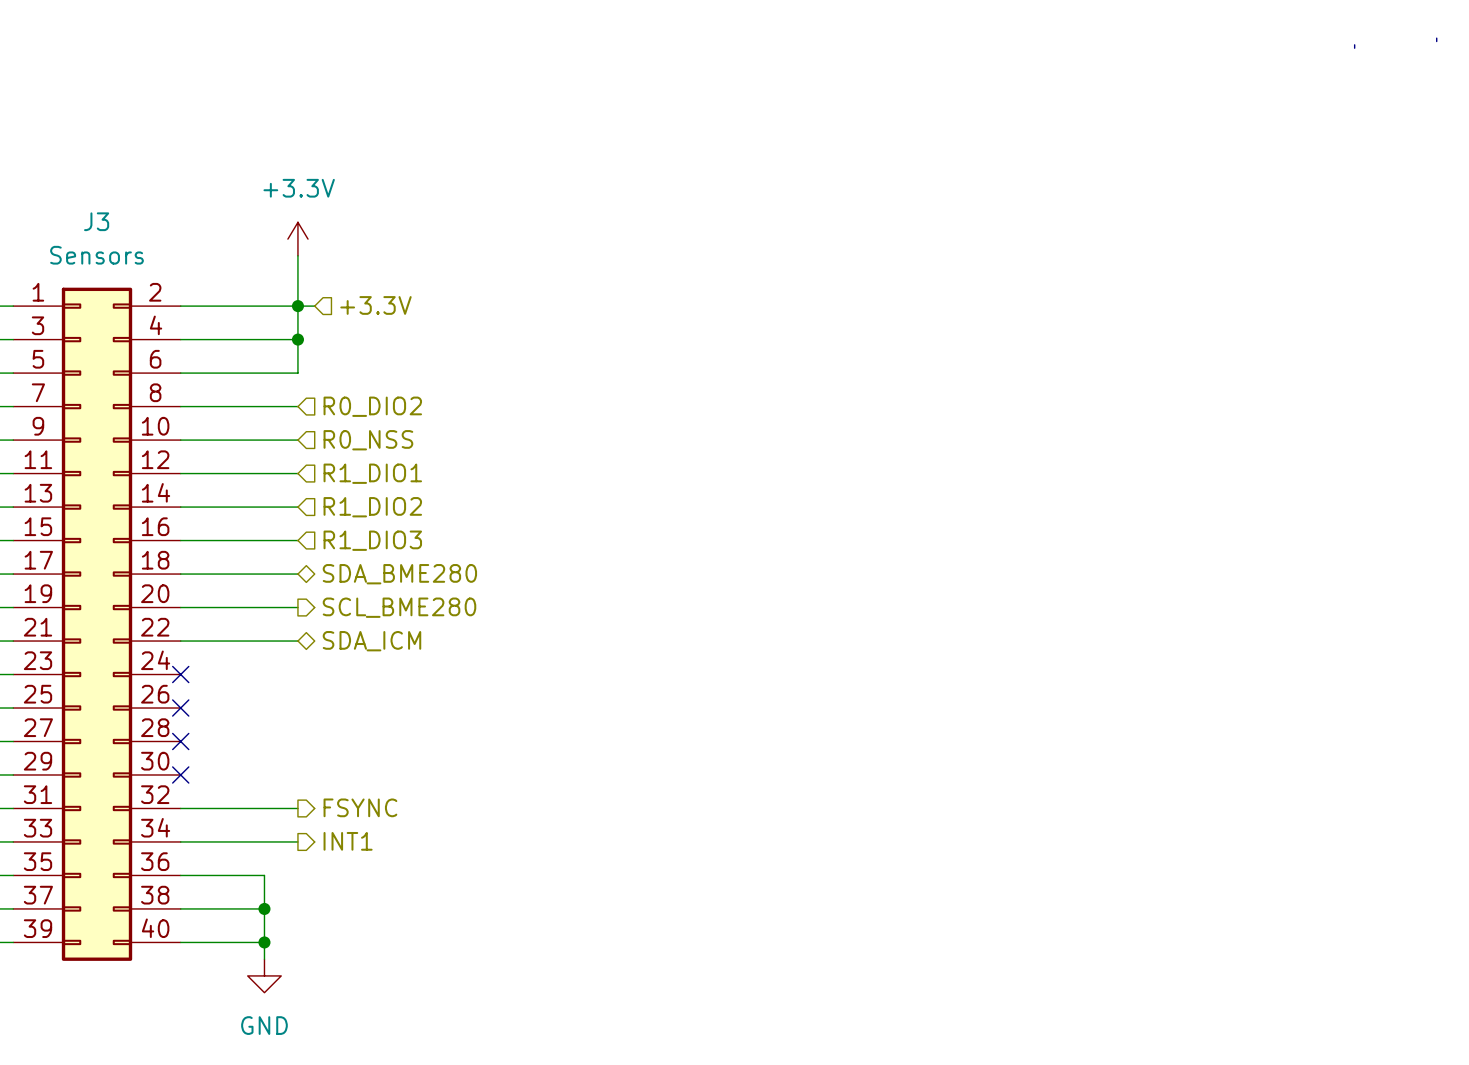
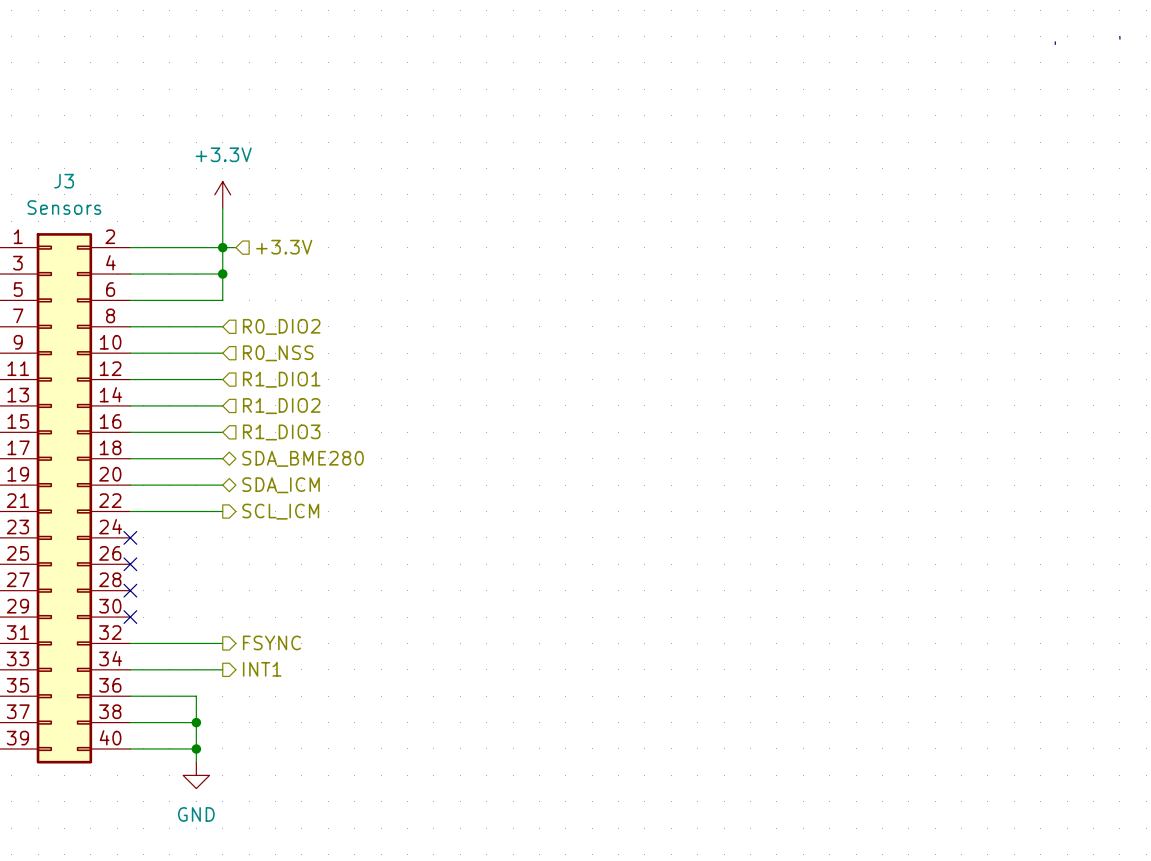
hierarchical label shape: output (399, 607) -> bidirectional (281, 485)
hierarchical label: SCL_BME280 (399, 607) -> SDA_ICM (281, 485)
hierarchical label shape: bidirectional (371, 641) -> output (280, 511)
hierarchical label: SDA_ICM (371, 641) -> SCL_ICM (280, 511)

